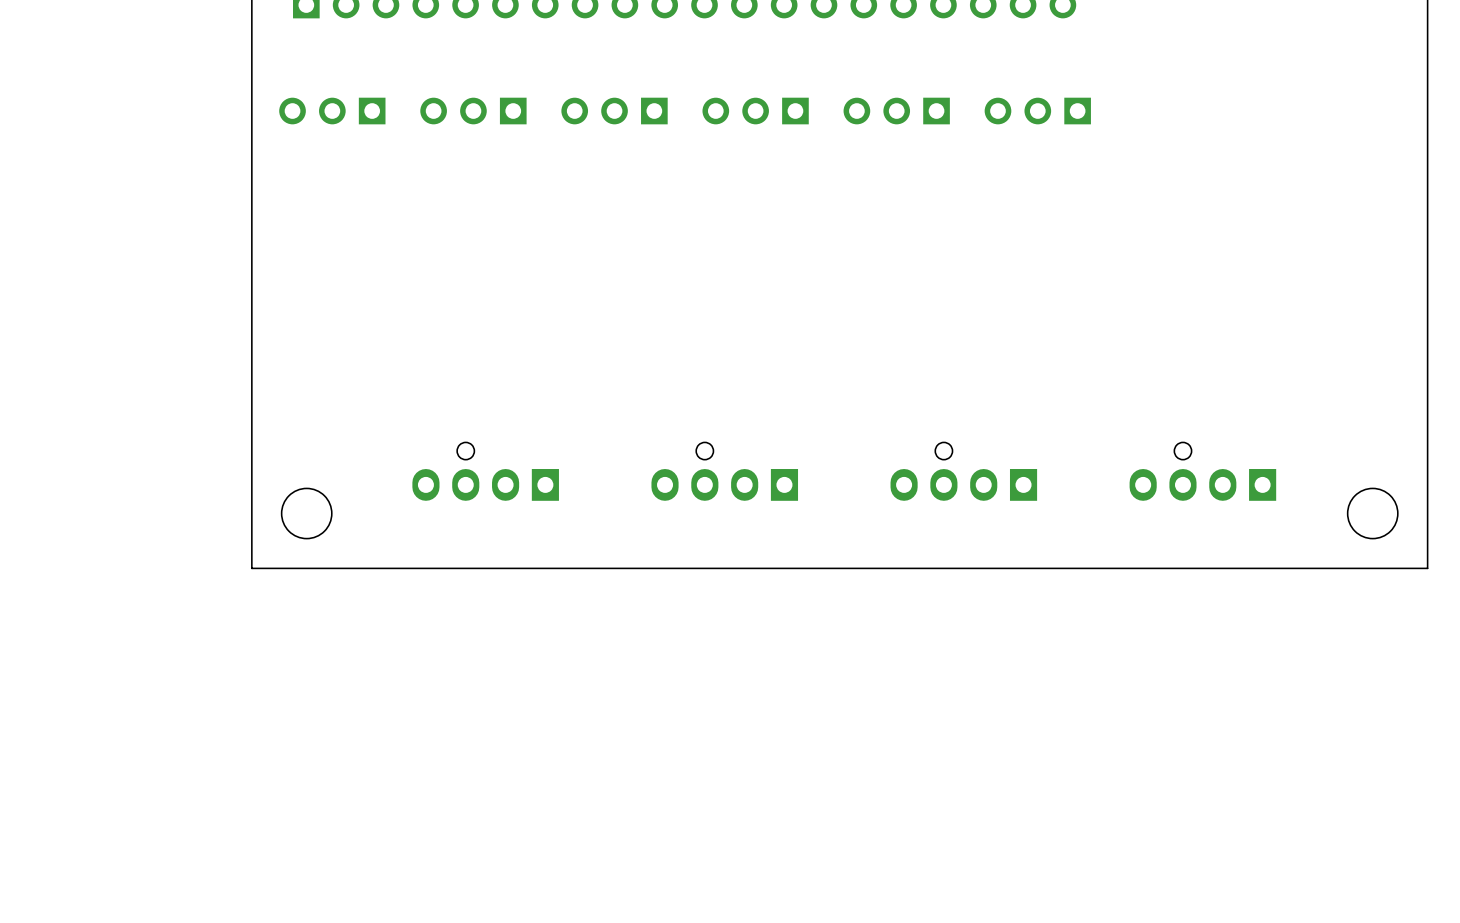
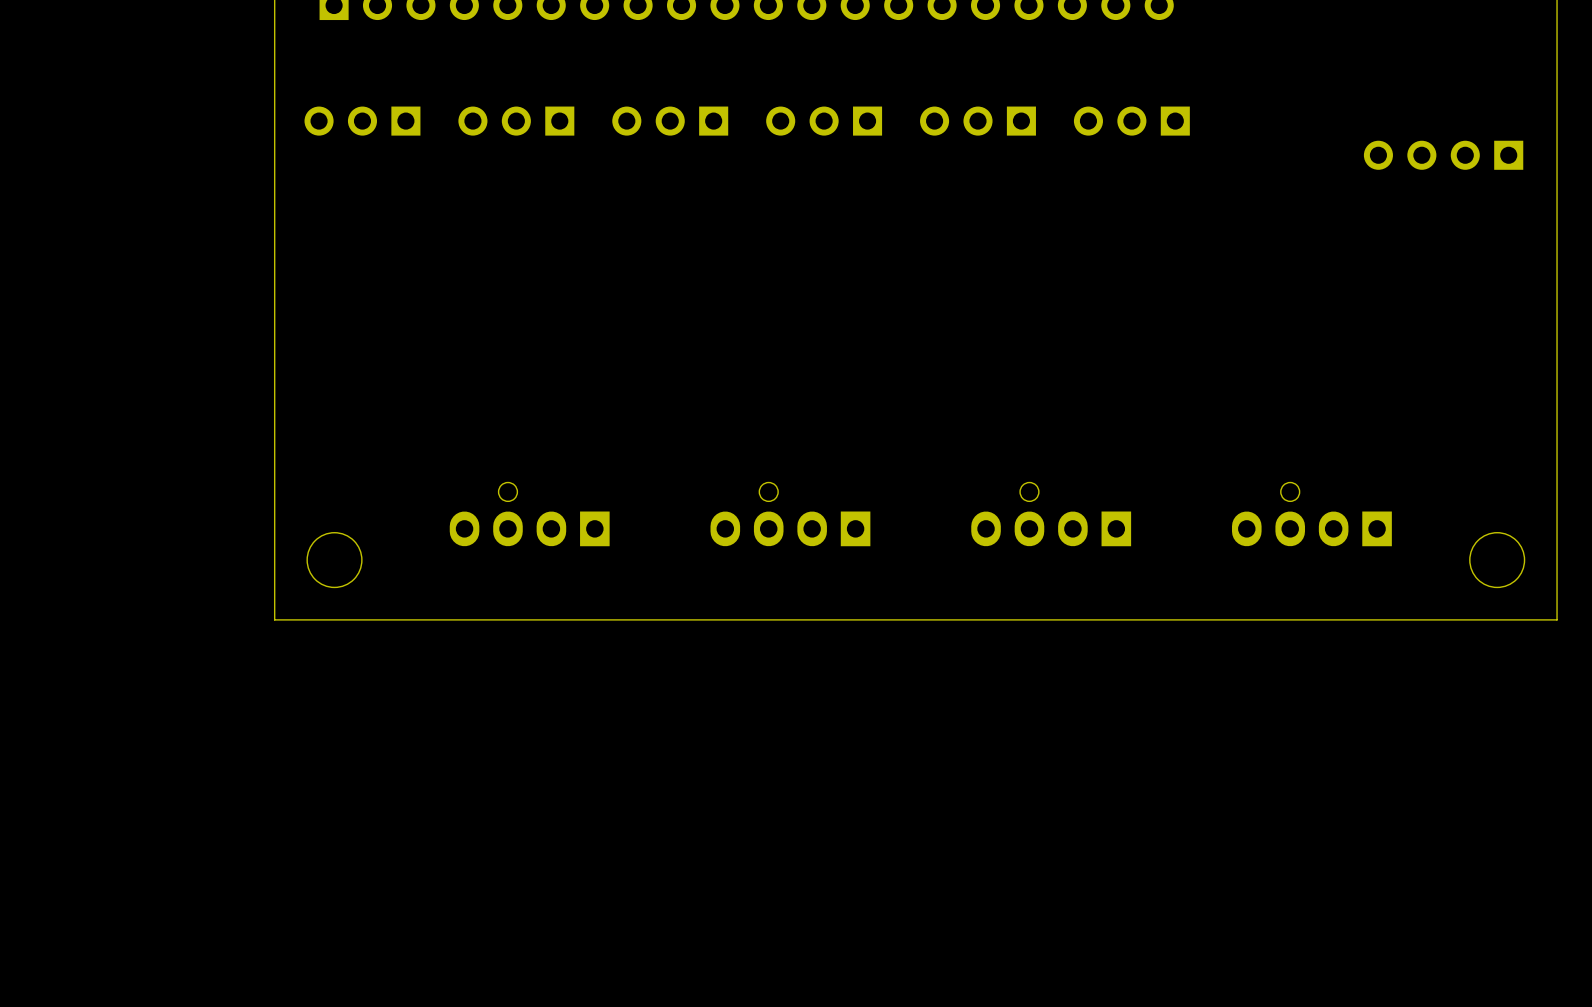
part: none -> (1443, 155)

